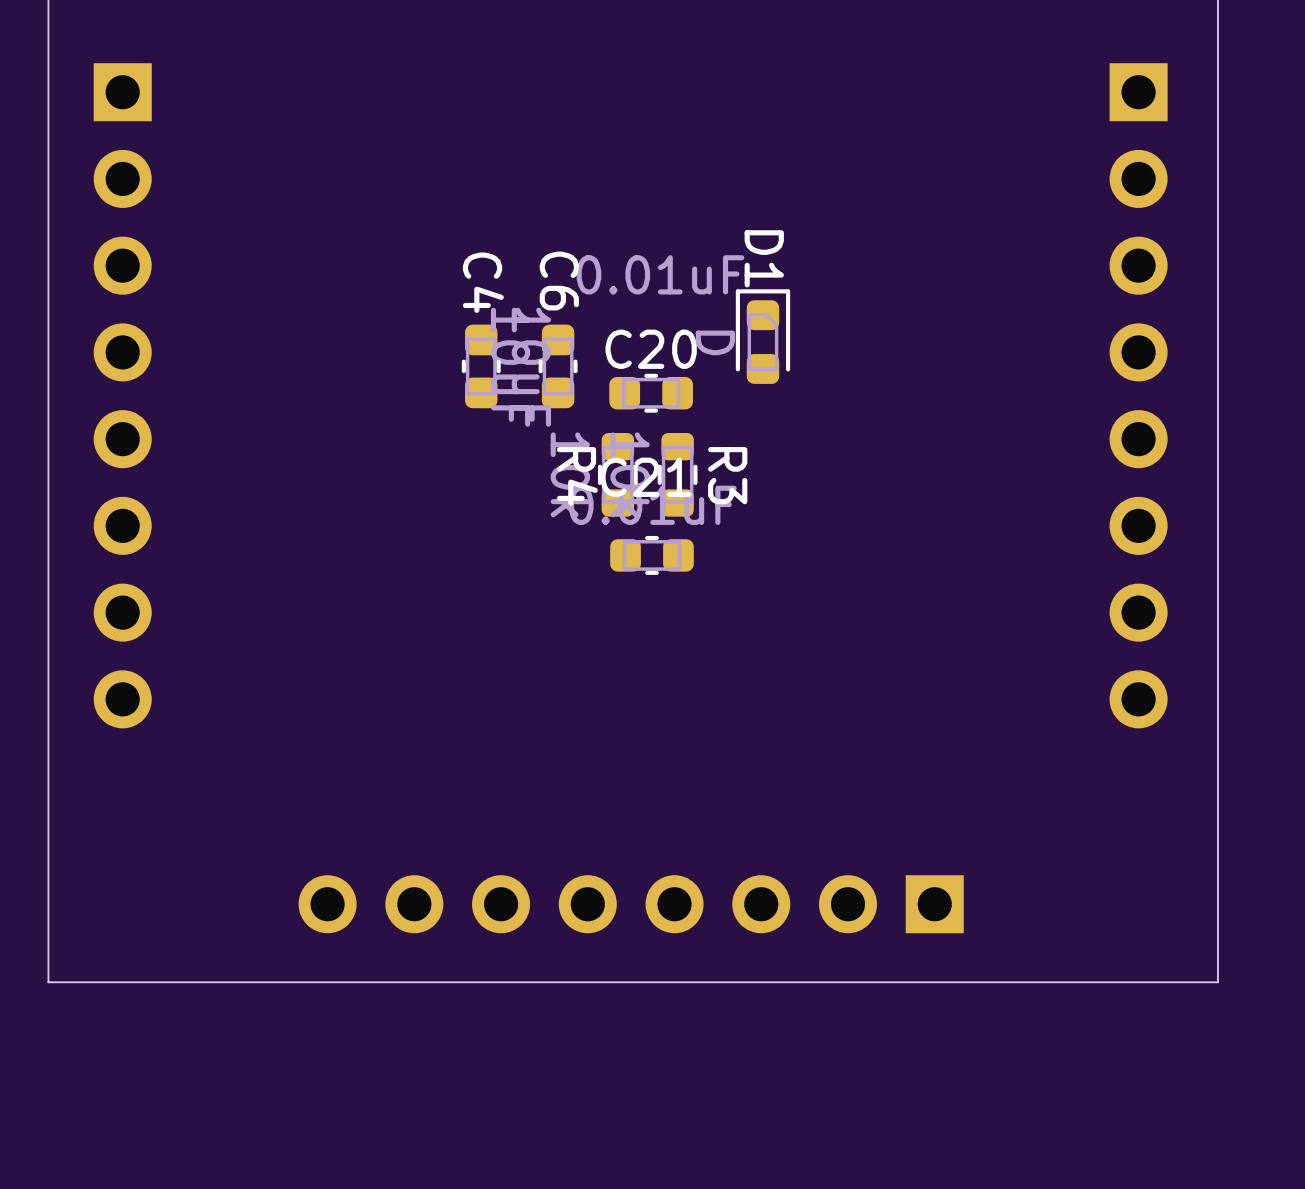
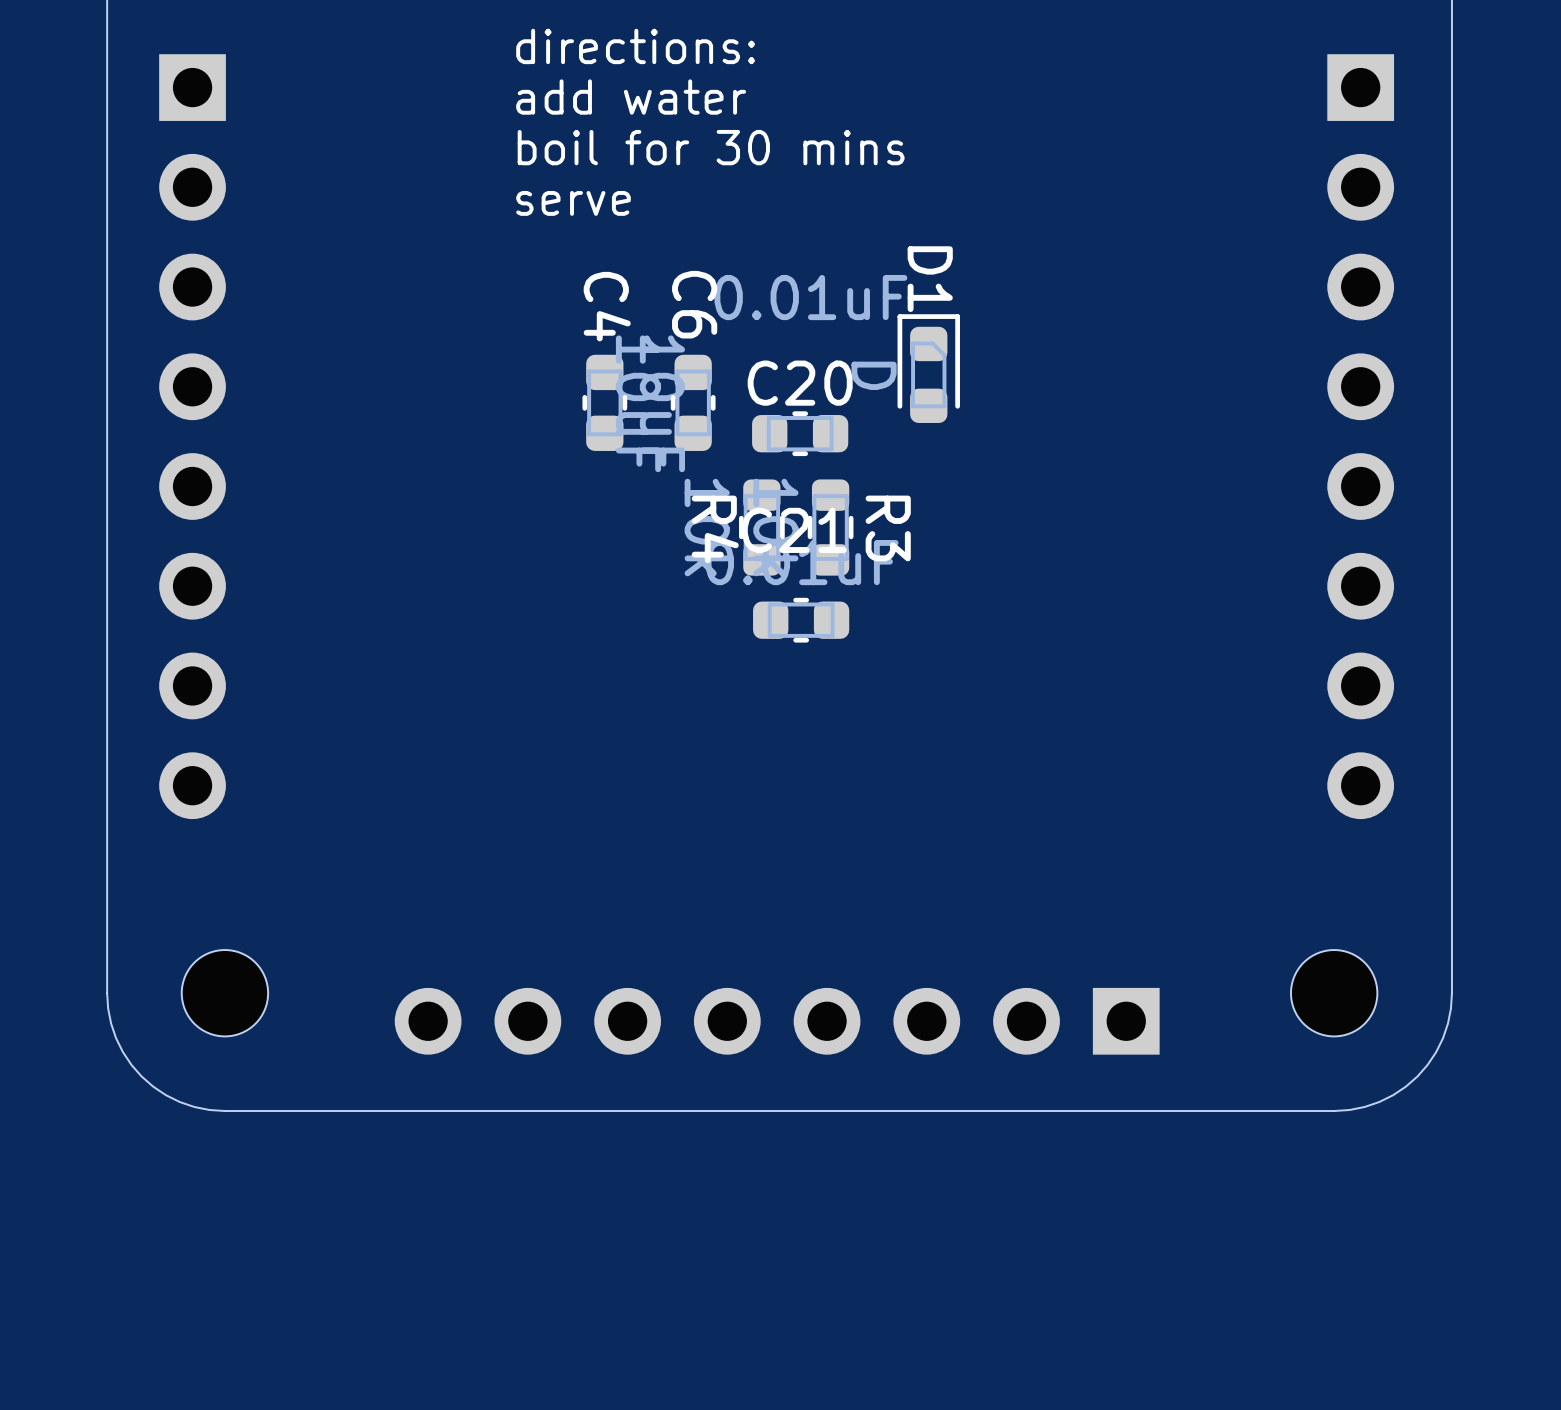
text: none -> directions: (635, 46)
text: none -> add water (631, 97)
text: none -> boil for 30 mins (711, 147)
text: none -> serve (573, 203)
board edge: (48, 879) (48, 982) (150, 982) -> (107, 993) (111, 1023) (116, 1038) (131, 1064) (141, 1076) (166, 1095) (179, 1102) (194, 1106) (224, 1111)
part: none -> (224, 993)
part: none -> (1334, 993)
board edge: (1217, 879) (1217, 982) (1115, 982) -> (1451, 993) (1450, 1008) (1443, 1038) (1427, 1064) (1417, 1076) (1405, 1086) (1379, 1102) (1349, 1110) (1334, 1111)

